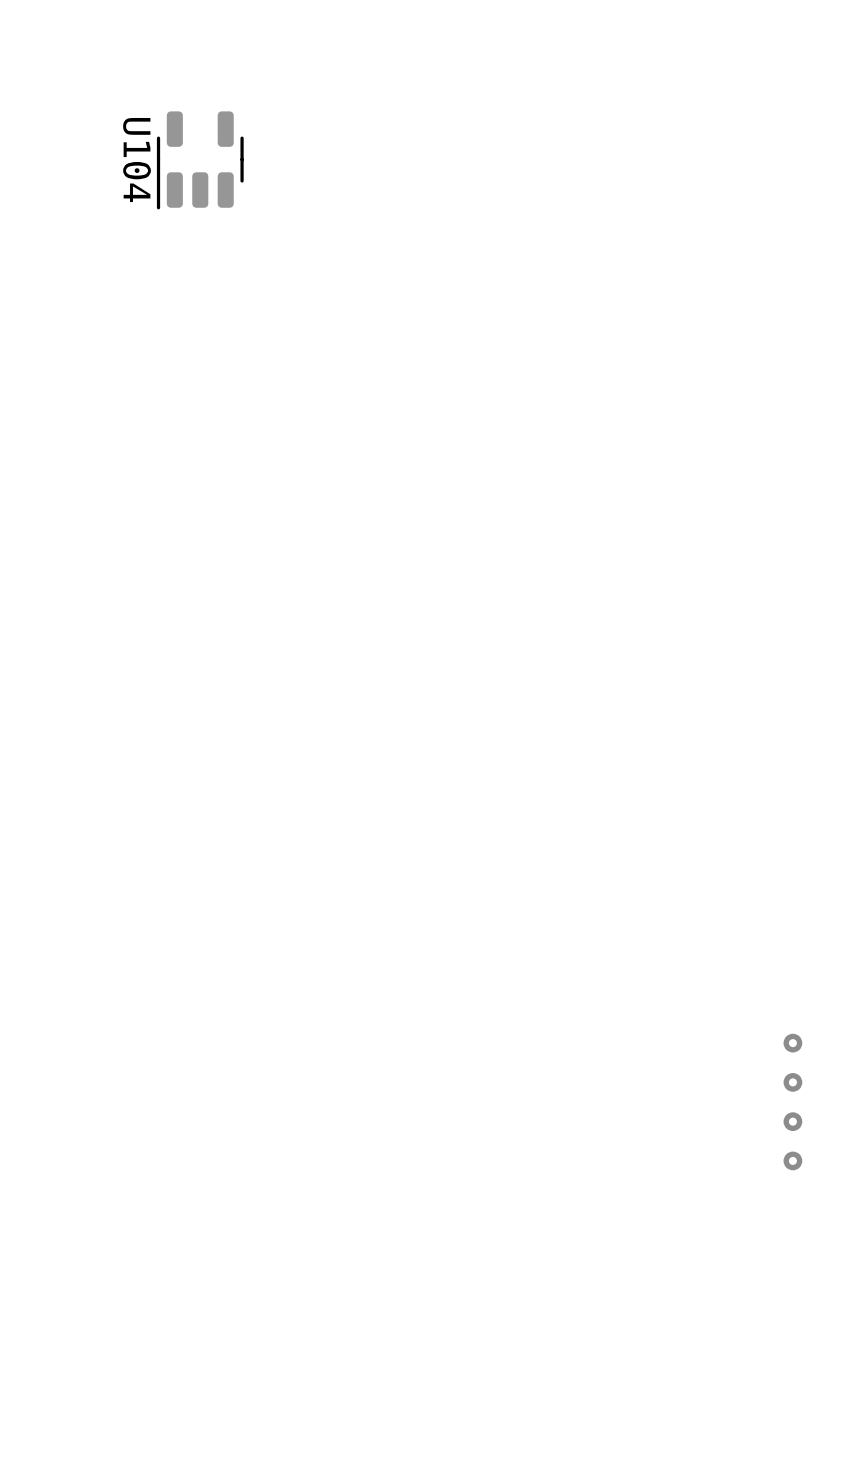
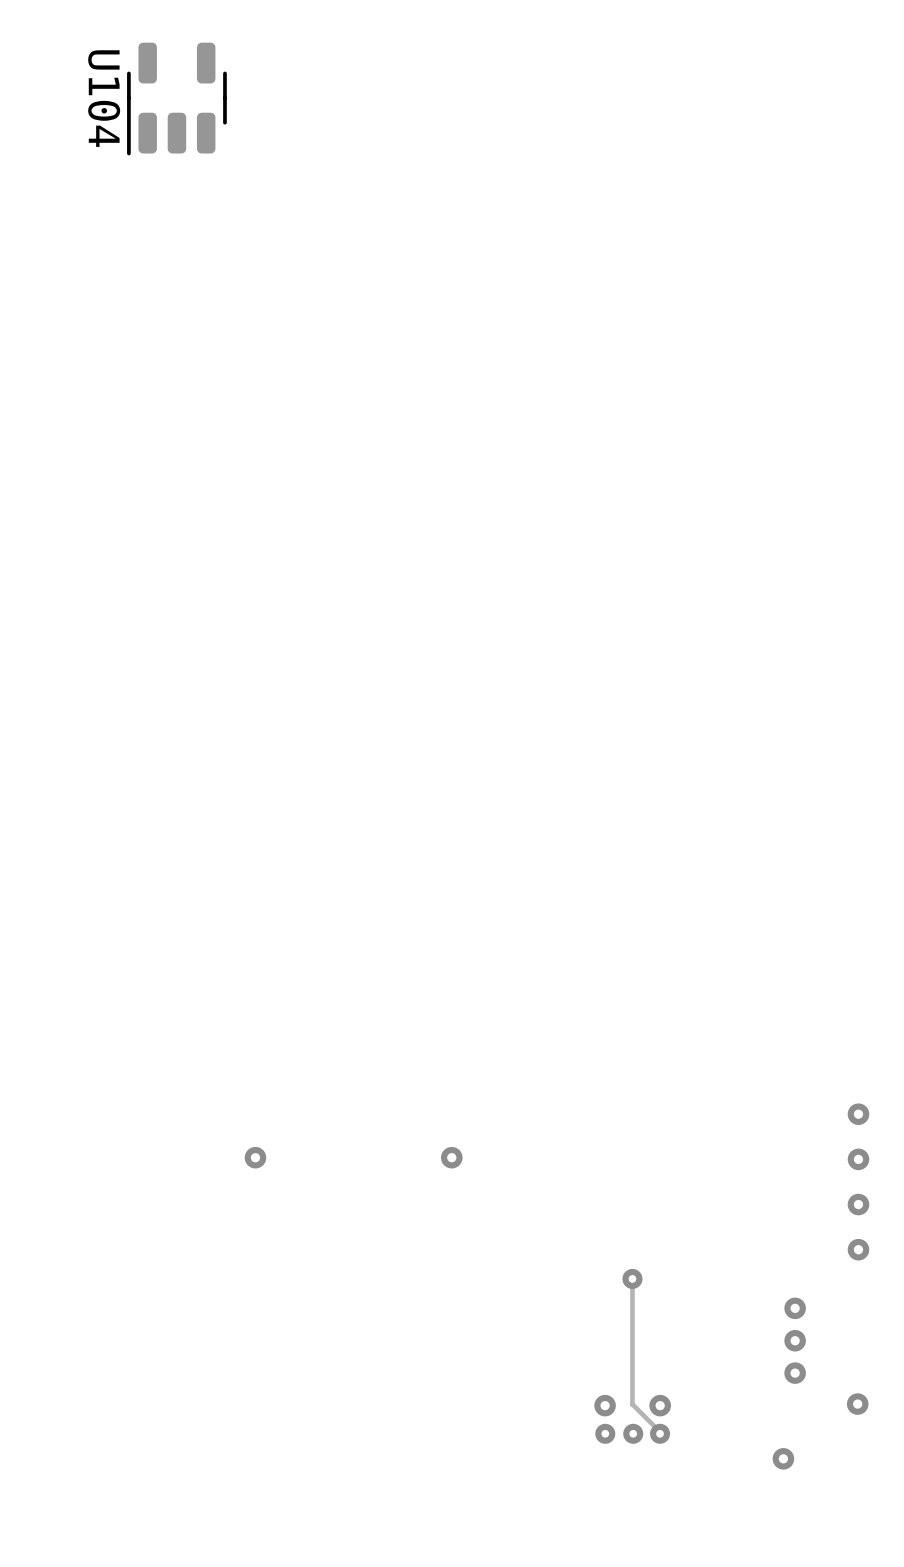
via: none -> (255, 1157)
via: none -> (451, 1157)
track: none -> (632, 1278) (632, 1404) (660, 1433)
via: none -> (632, 1278)
via: none -> (795, 1308)
via: none -> (795, 1340)
via: none -> (795, 1373)
via: none -> (857, 1404)
via: none -> (605, 1405)
via: none -> (660, 1405)
via: none -> (605, 1433)
via: none -> (633, 1433)
via: none -> (660, 1433)
via: none -> (783, 1458)

